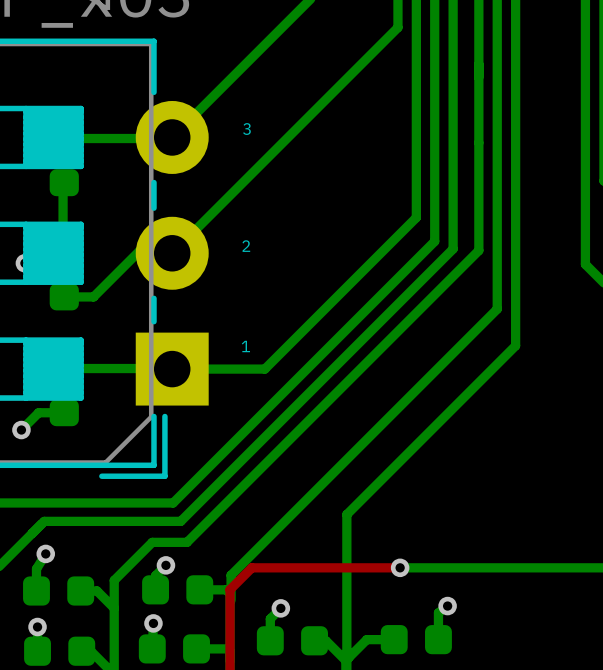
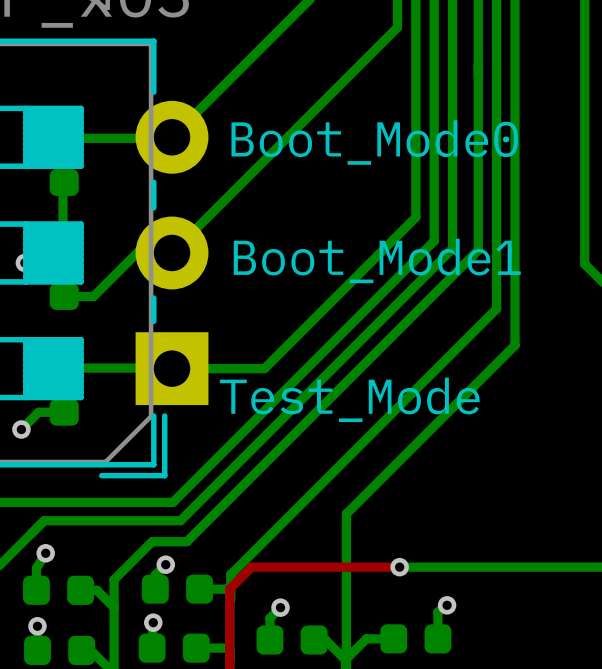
text: 3 (246, 129) -> none
text: none -> Boot_Mode0 (374, 142)
text: 2 (246, 246) -> none
text: none -> Boot_Mode1 (377, 260)
text: 1 (245, 346) -> none
text: none -> Test_Mode (349, 399)

